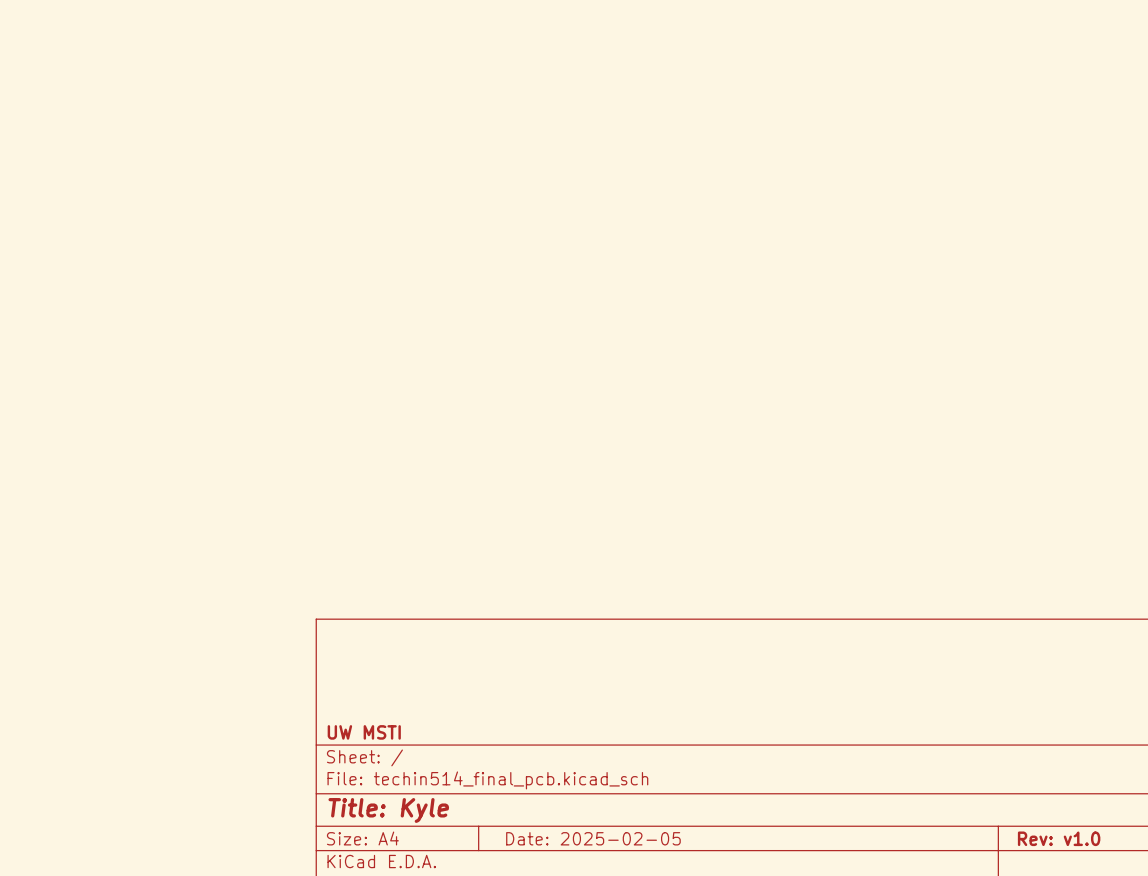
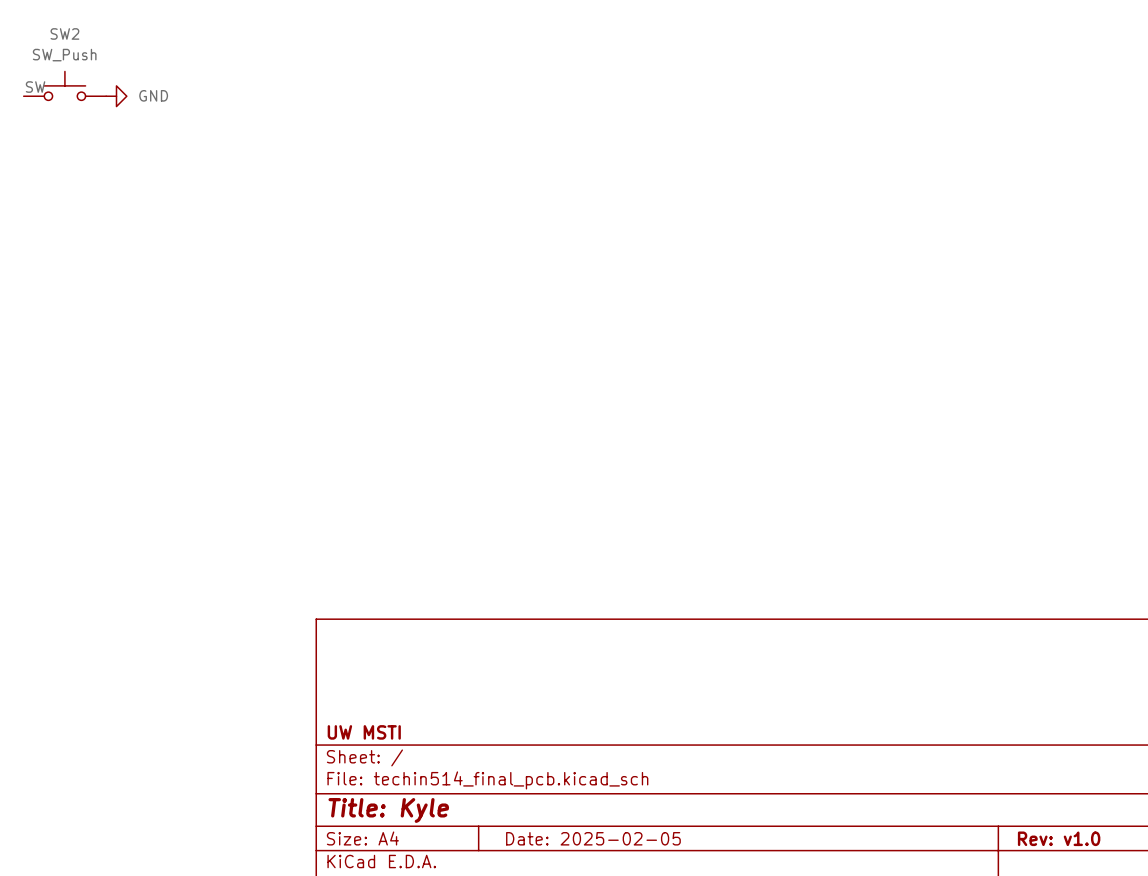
SW2: none -> SW_Push (64, 85)
label: none -> SW (35, 87)
power symbol: none -> GND (116, 96)

